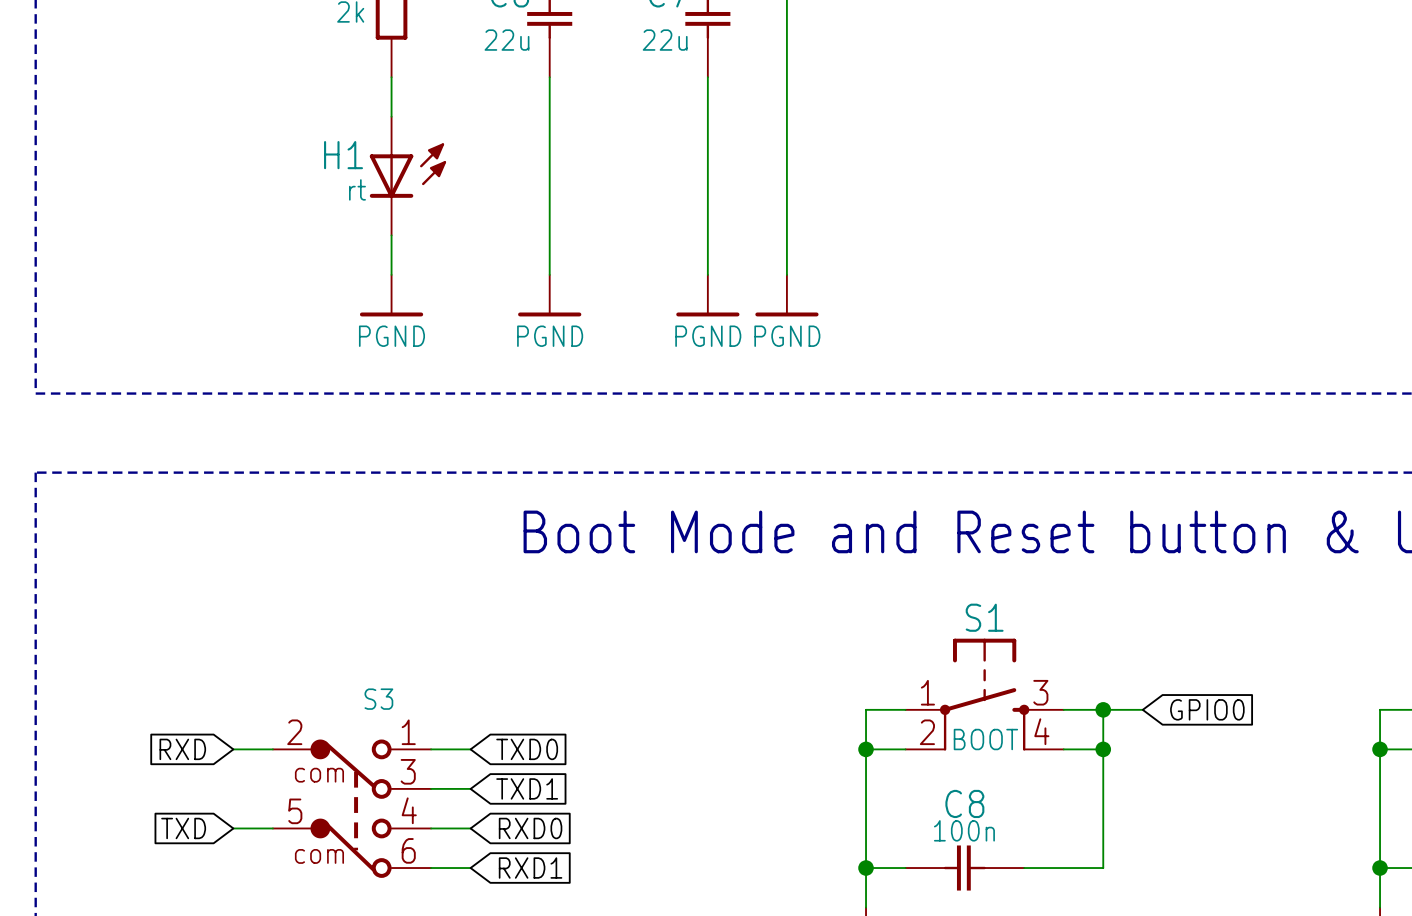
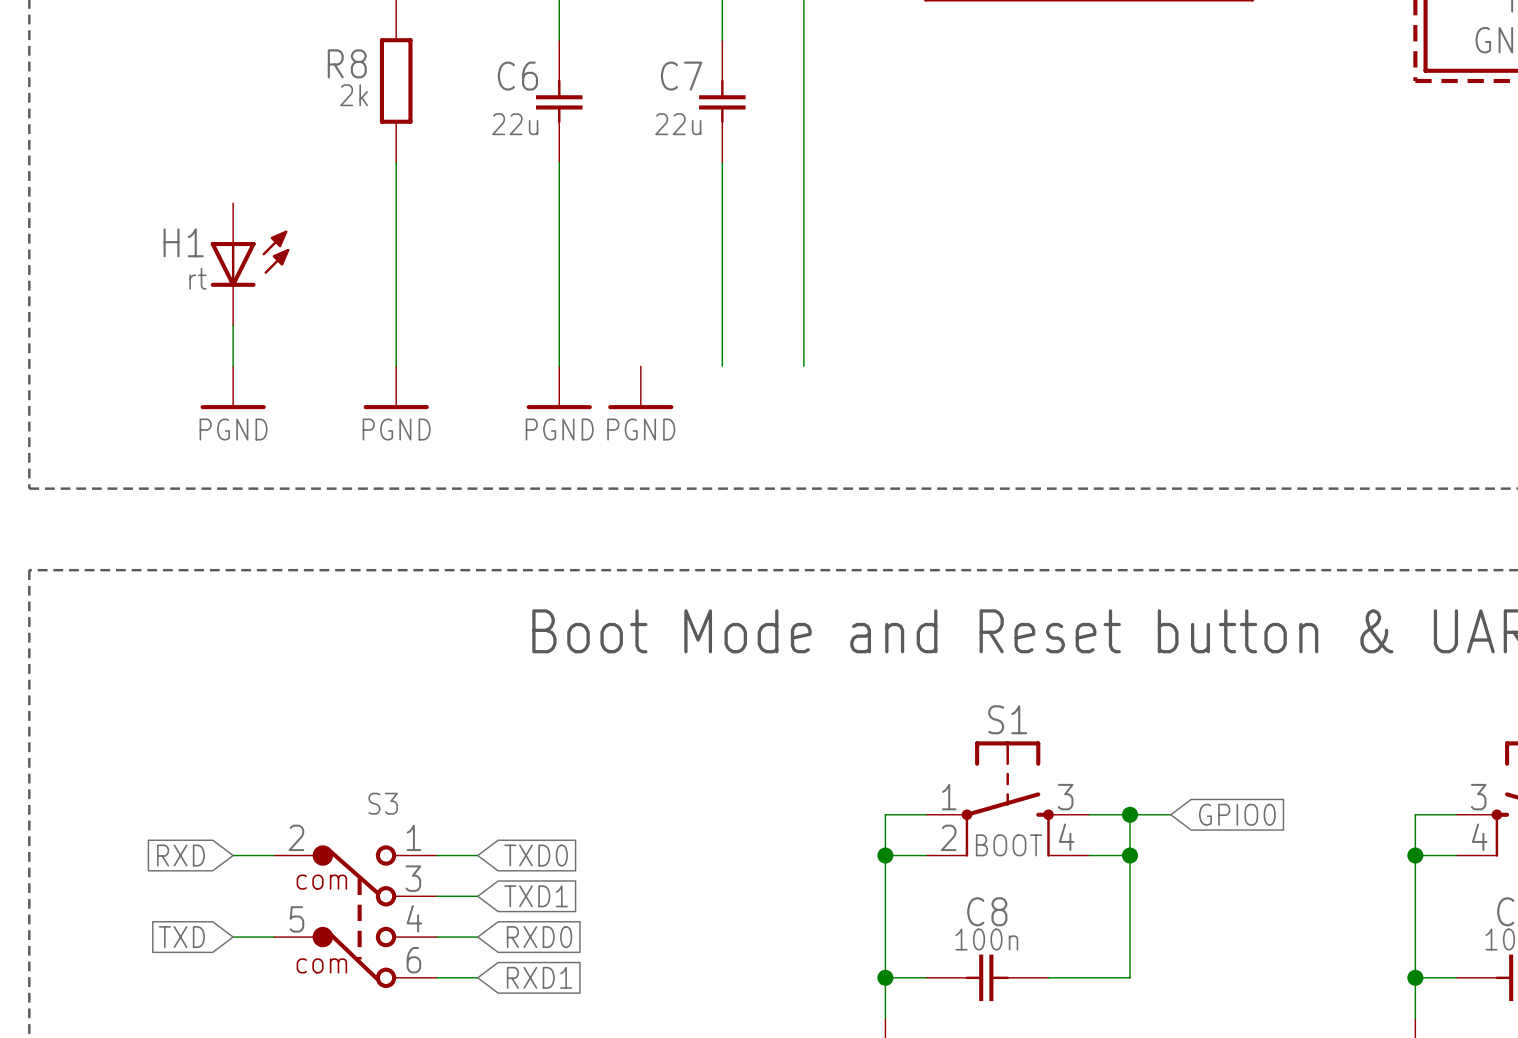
H1 position: (407, 176) -> (250, 264)
wire: none -> (233, 325) (233, 366)
power symbol: none -> PGND (233, 387)
power symbol: none -> PGND (640, 387)
power symbol: PGND (707, 295) -> none
power symbol: PGND (786, 295) -> none

